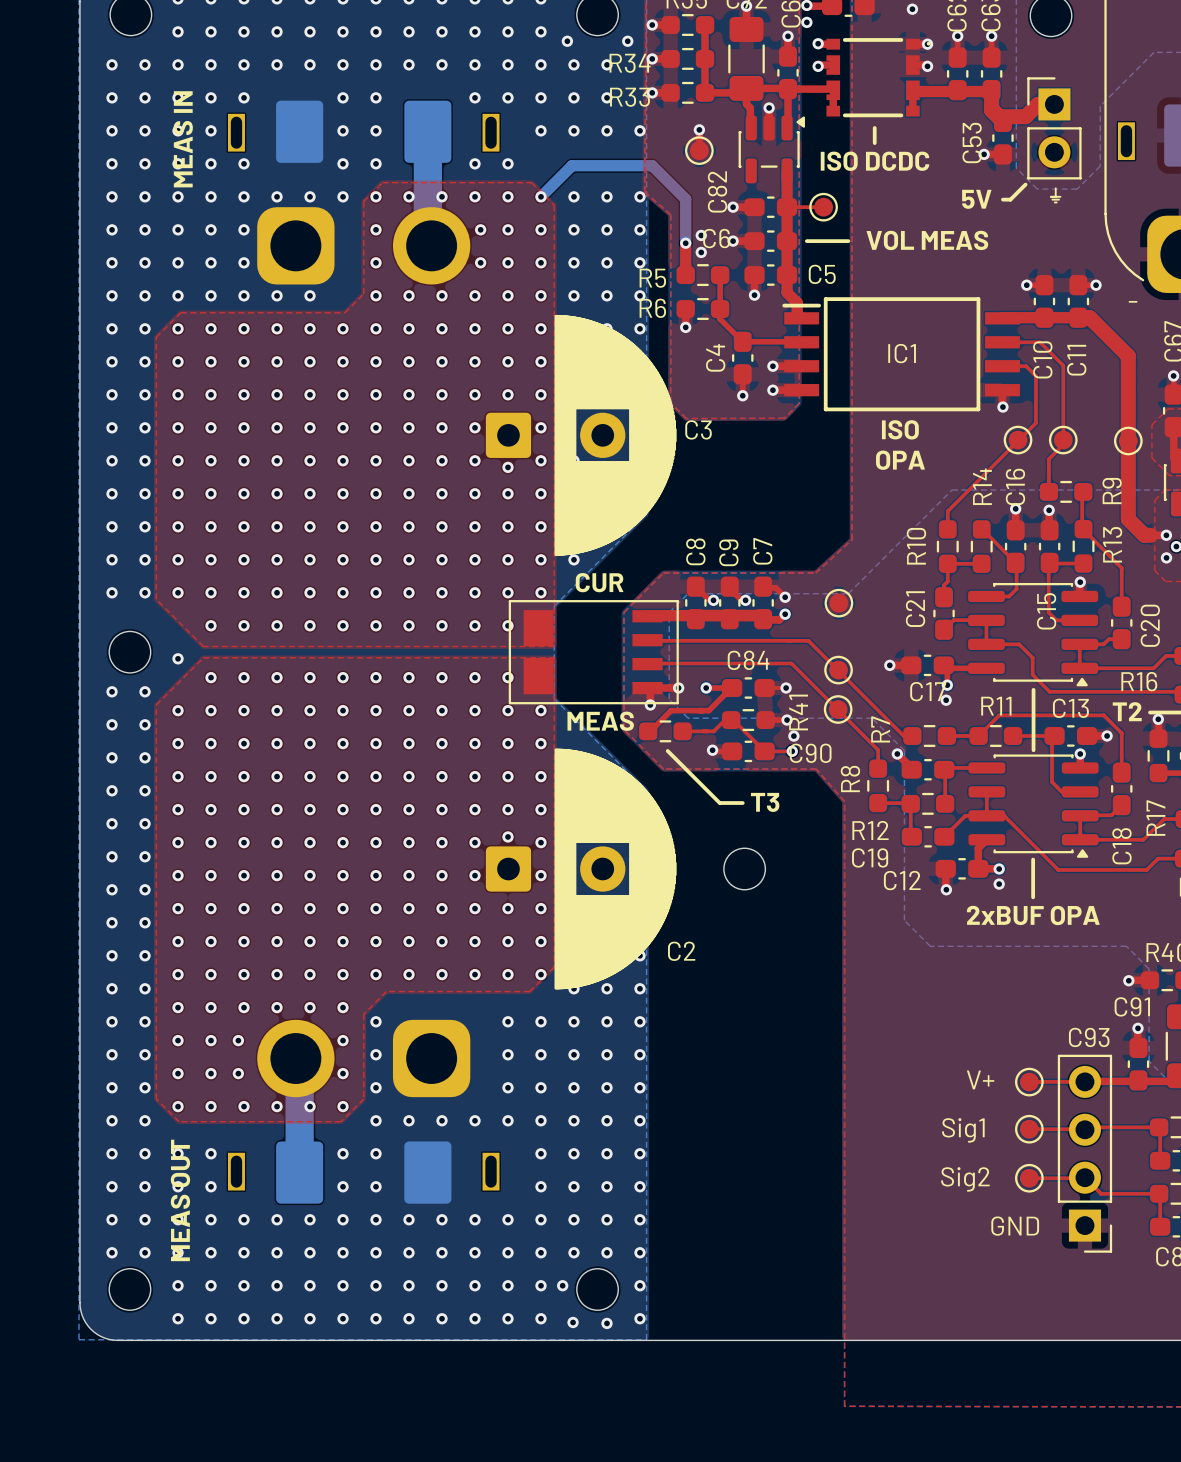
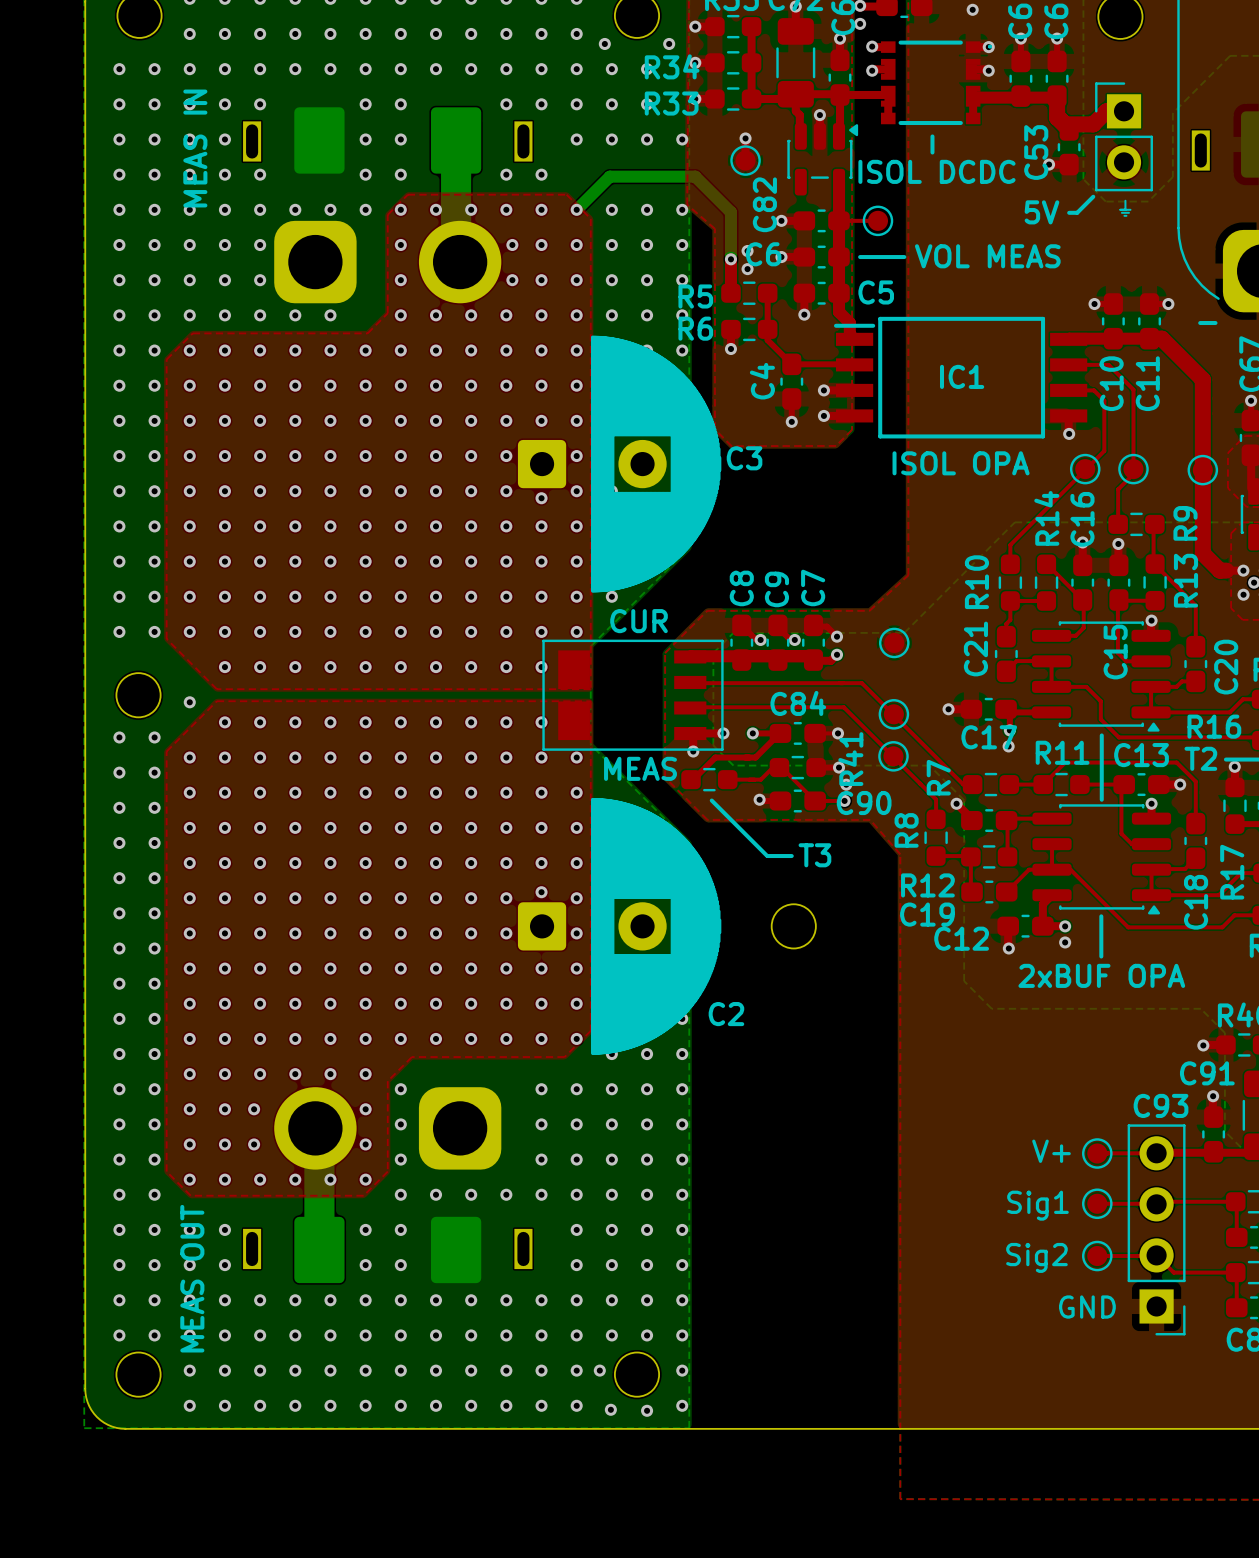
text: ISO DCDC (874, 161) -> ISOL DCDC (936, 171)
text: ISO (900, 429) -> ISOL OPA (961, 463)
text: OPA (900, 460) -> none

